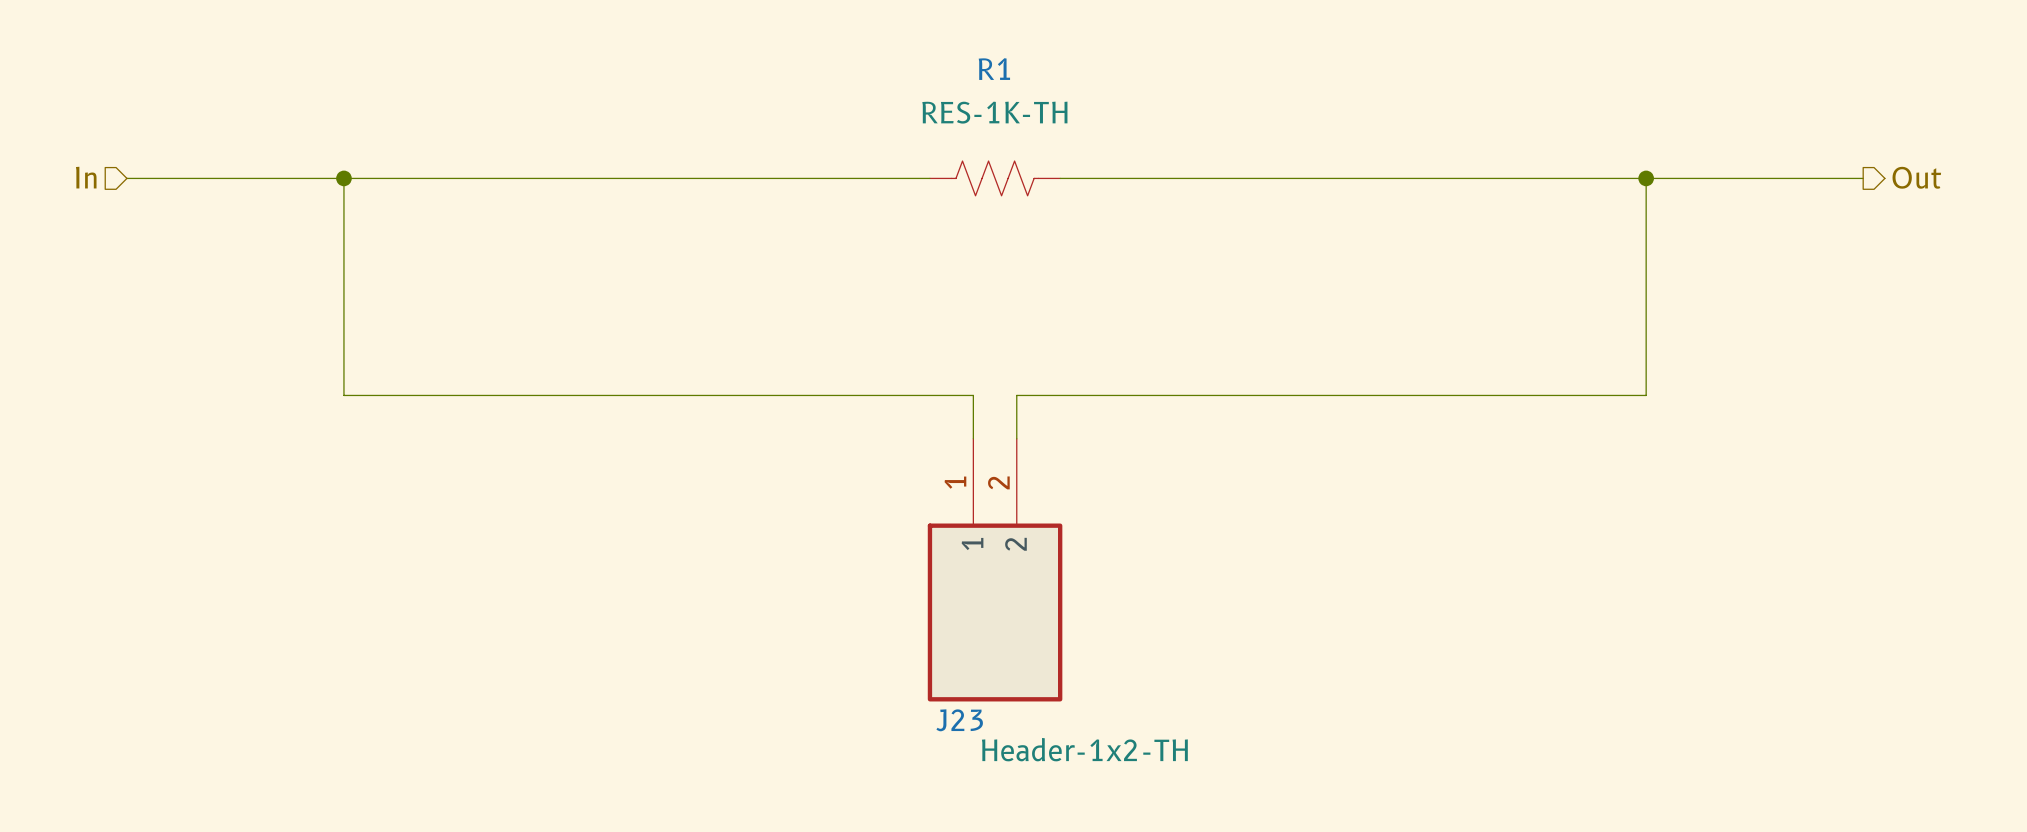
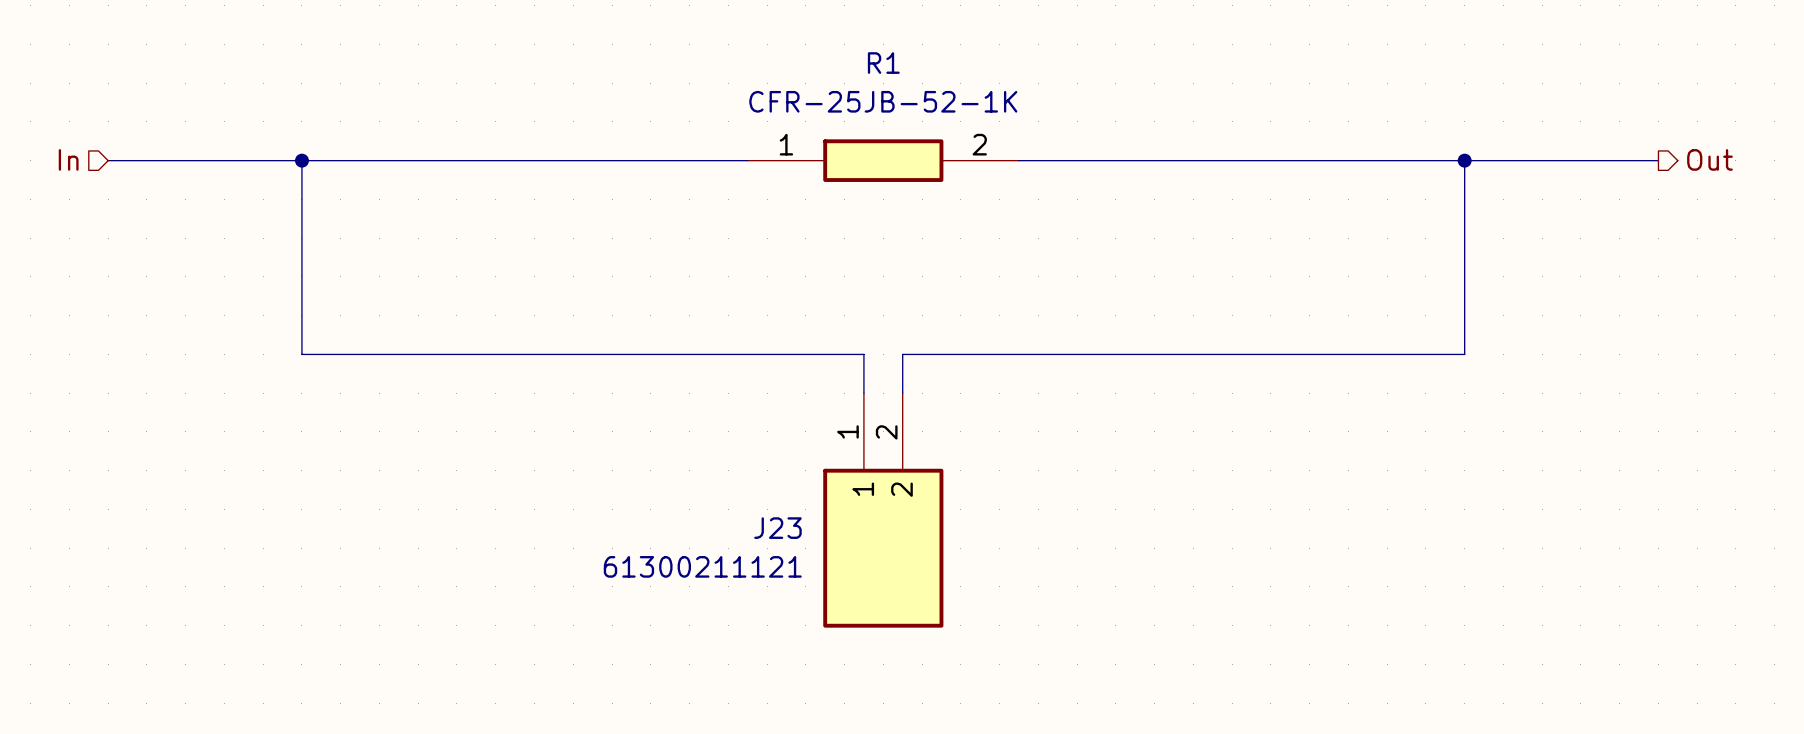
R1 value: RES-1K-TH (994, 112) -> CFR-25JB-52-1K (883, 101)
R1 symbol: [929, 161, 1061, 196] -> [747, 139, 1019, 182]
J23 name position: J23 (959, 720) -> J23 (777, 528)
J23 value: Header-1x2-TH (1084, 749) -> 61300211121 (702, 566)

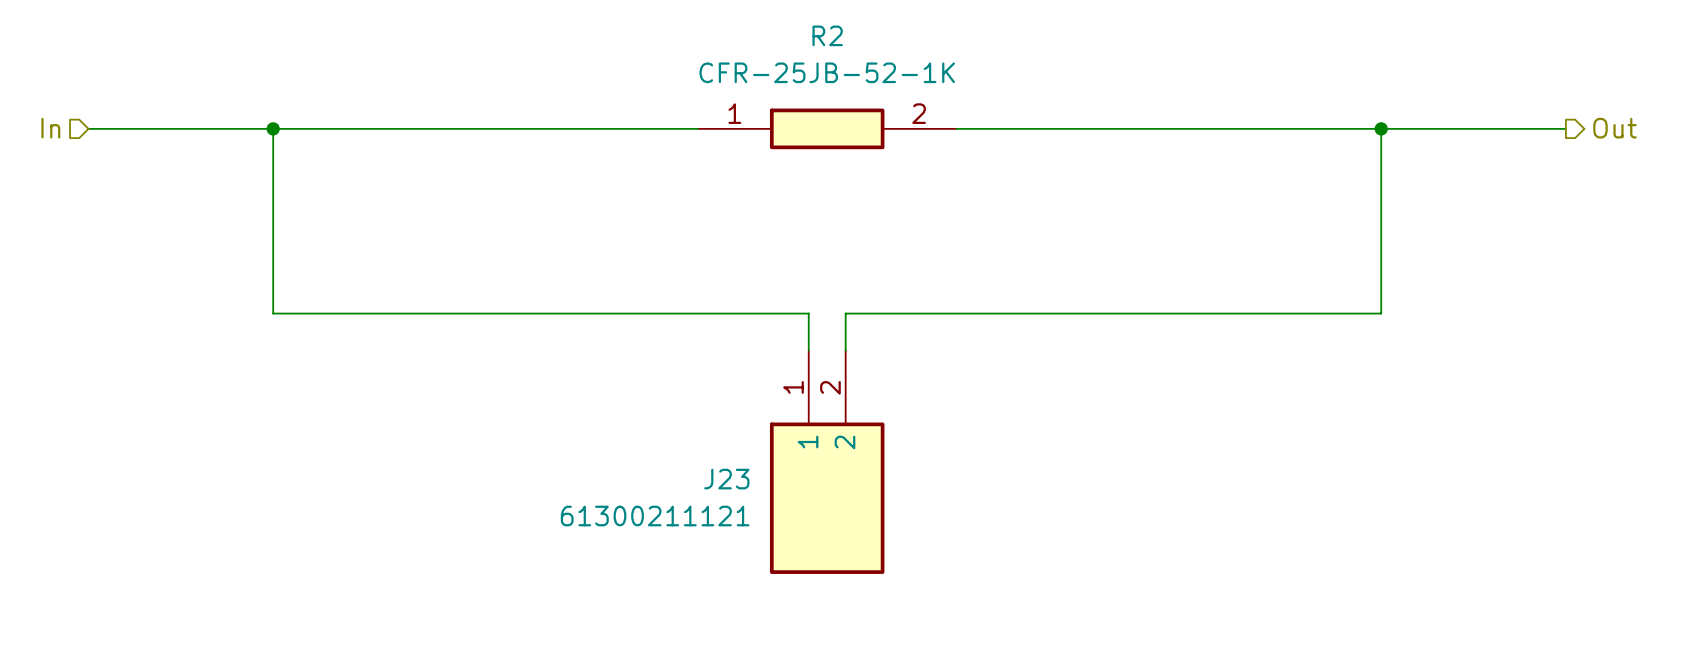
R1 name: R1 (883, 63) -> R2 (827, 35)

